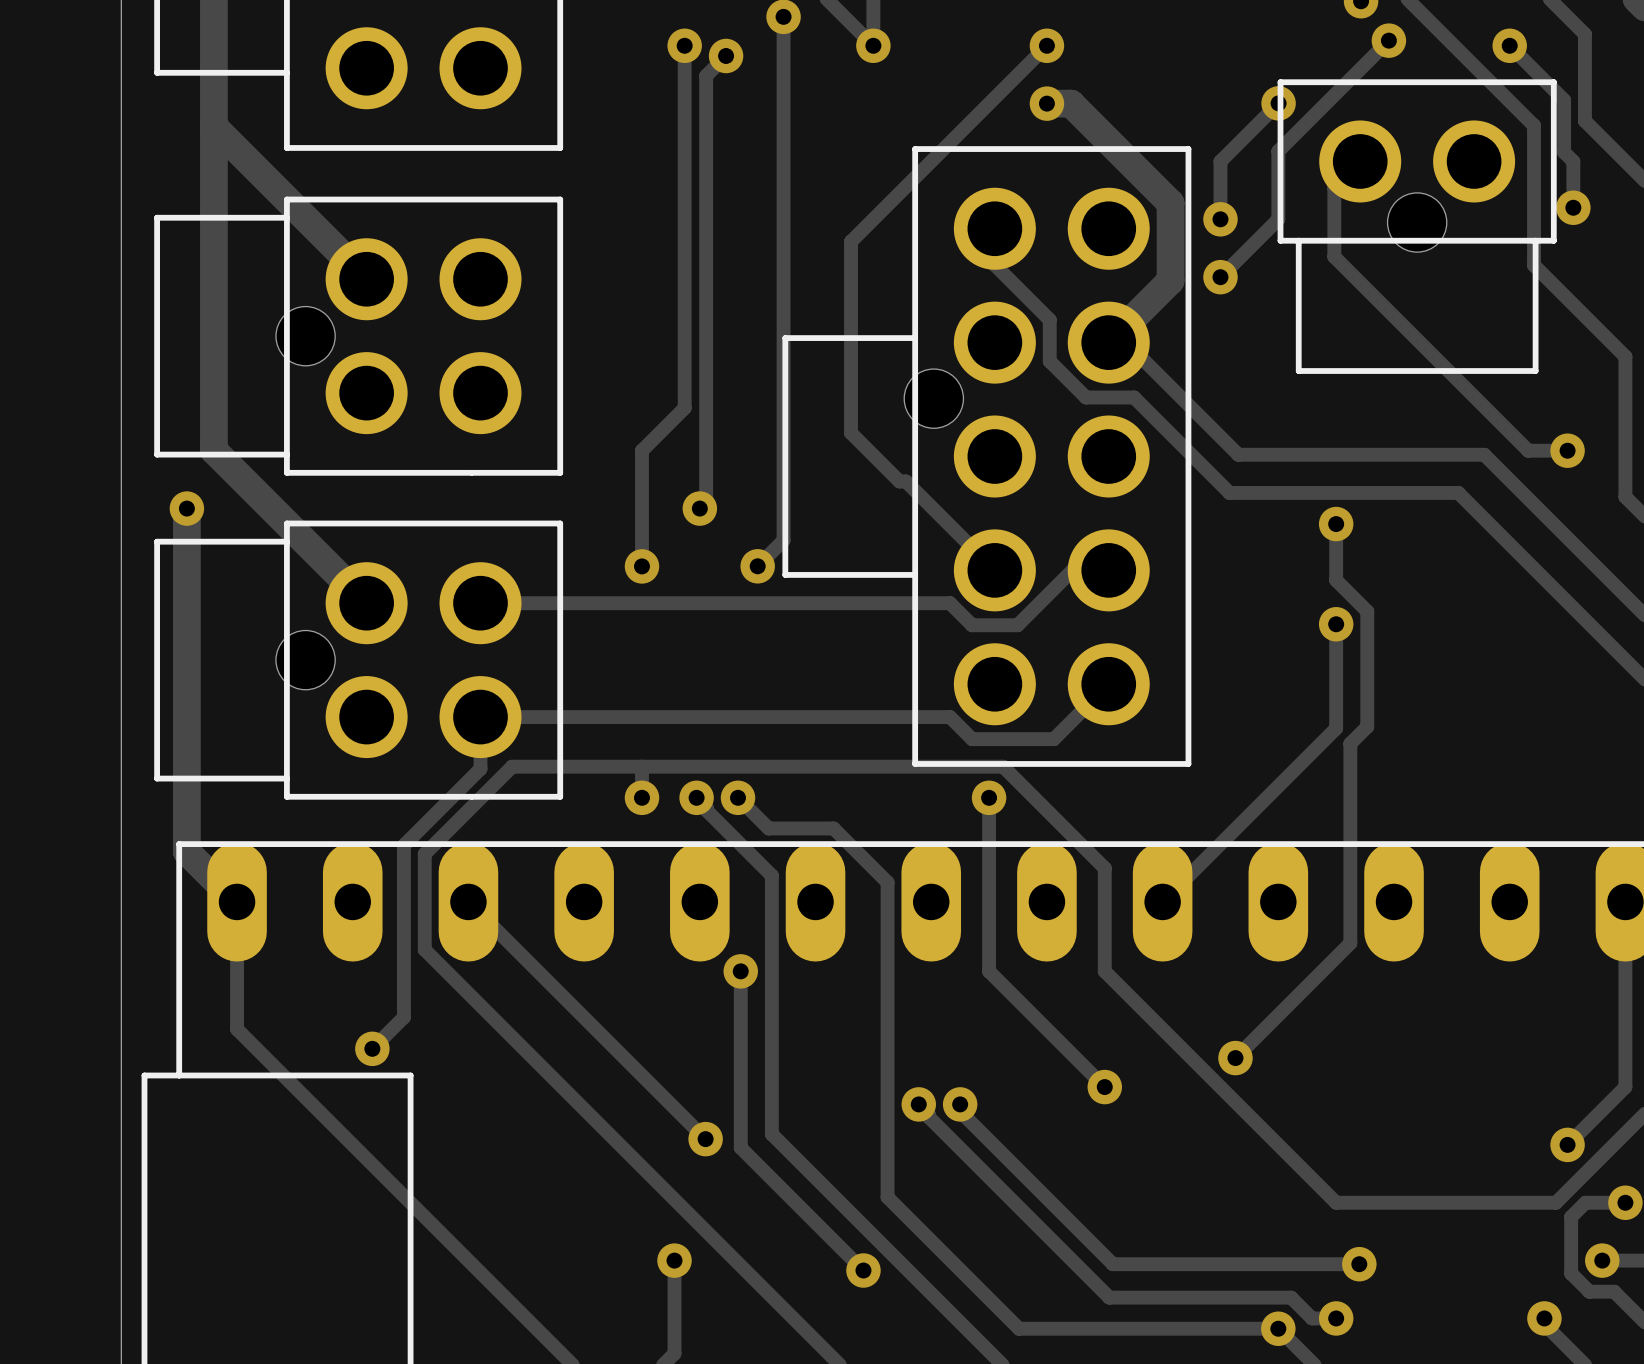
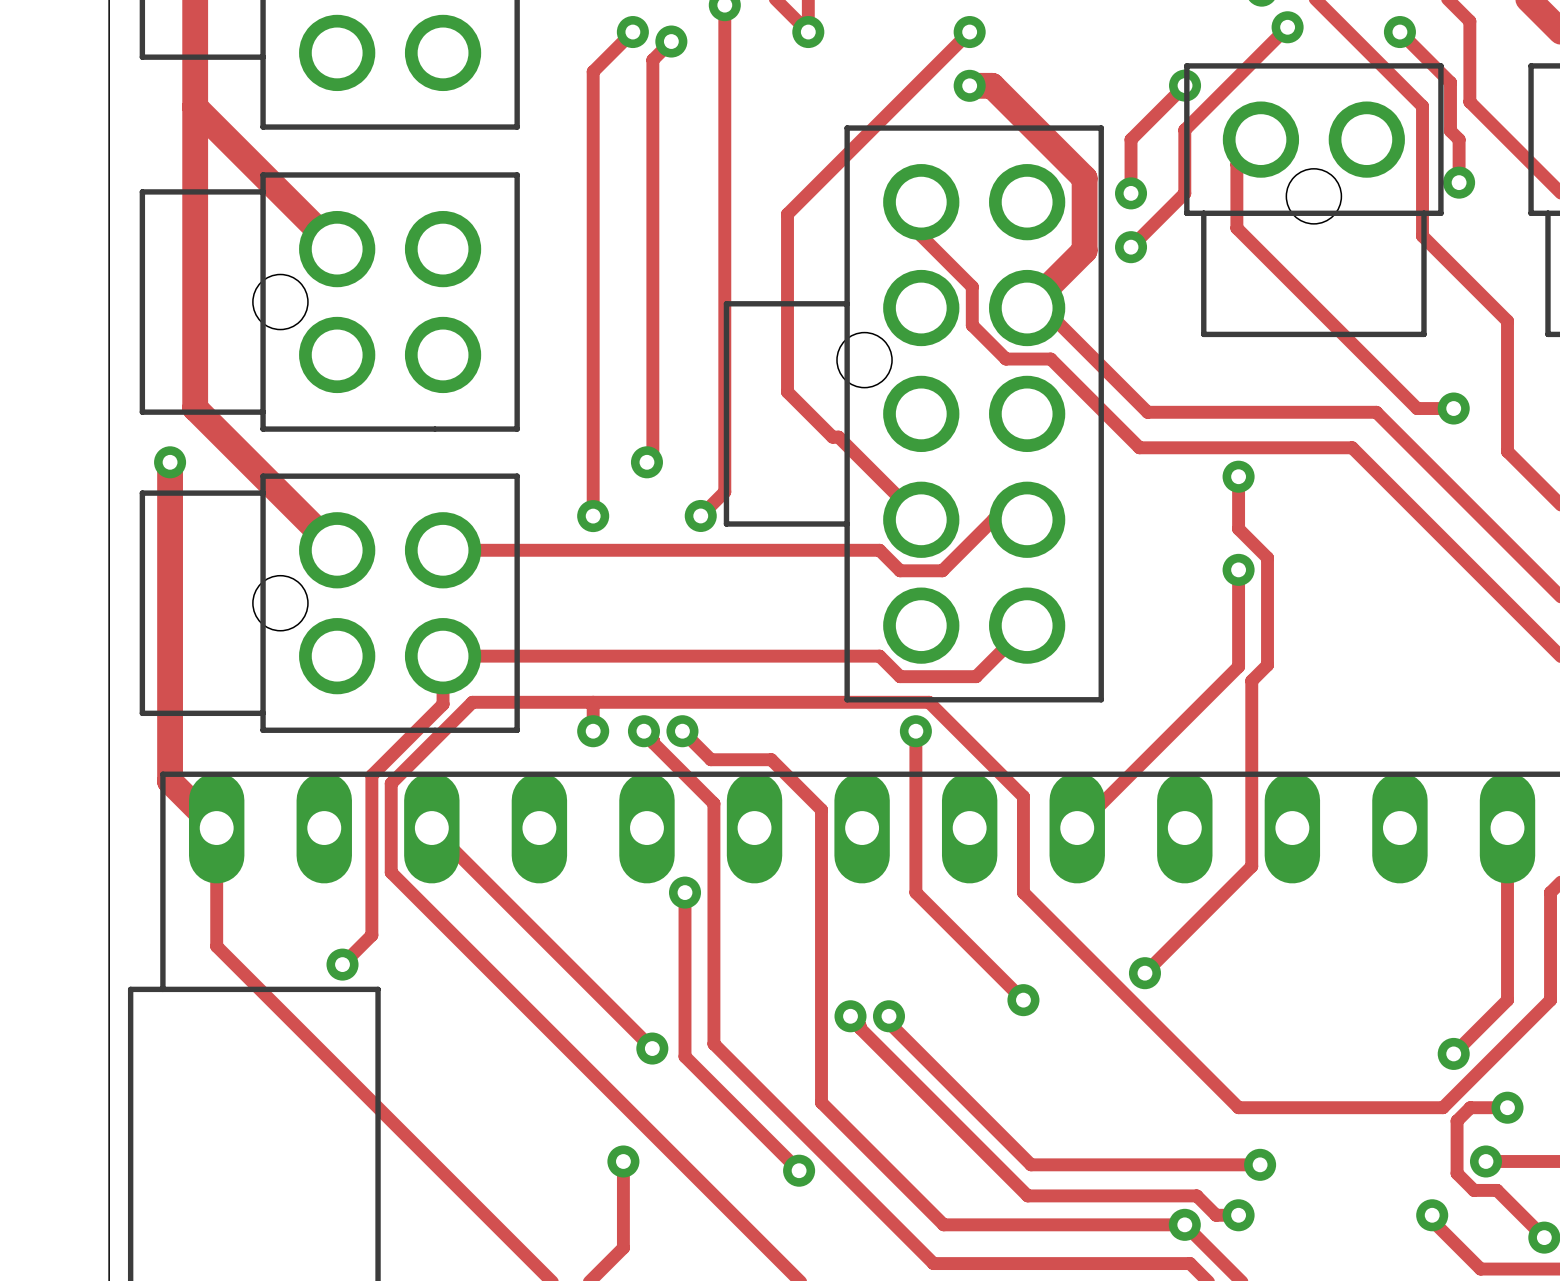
track: (684, 45) (684, 408) (641, 450) -> (632, 32) (593, 71) (593, 408)

